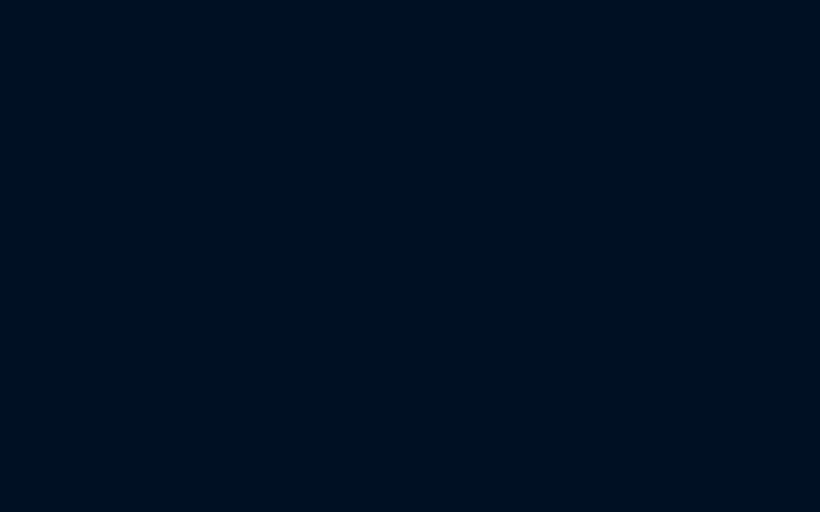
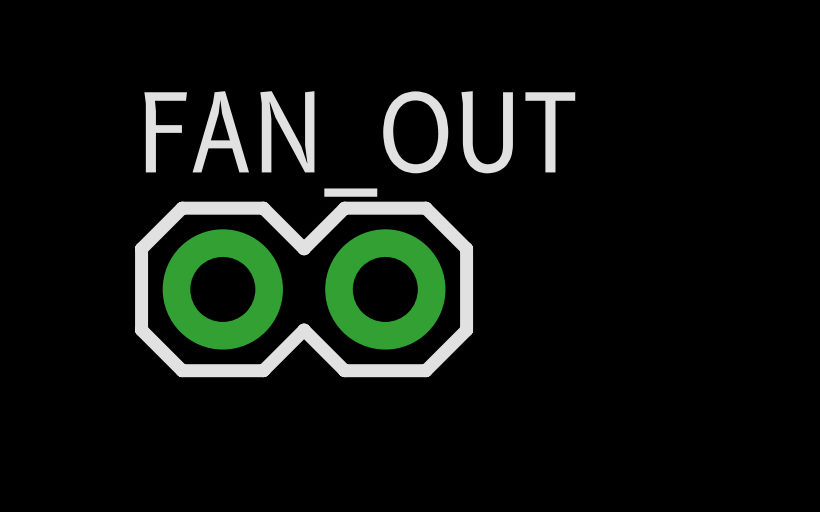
FAN_OUT: none -> (304, 289)

